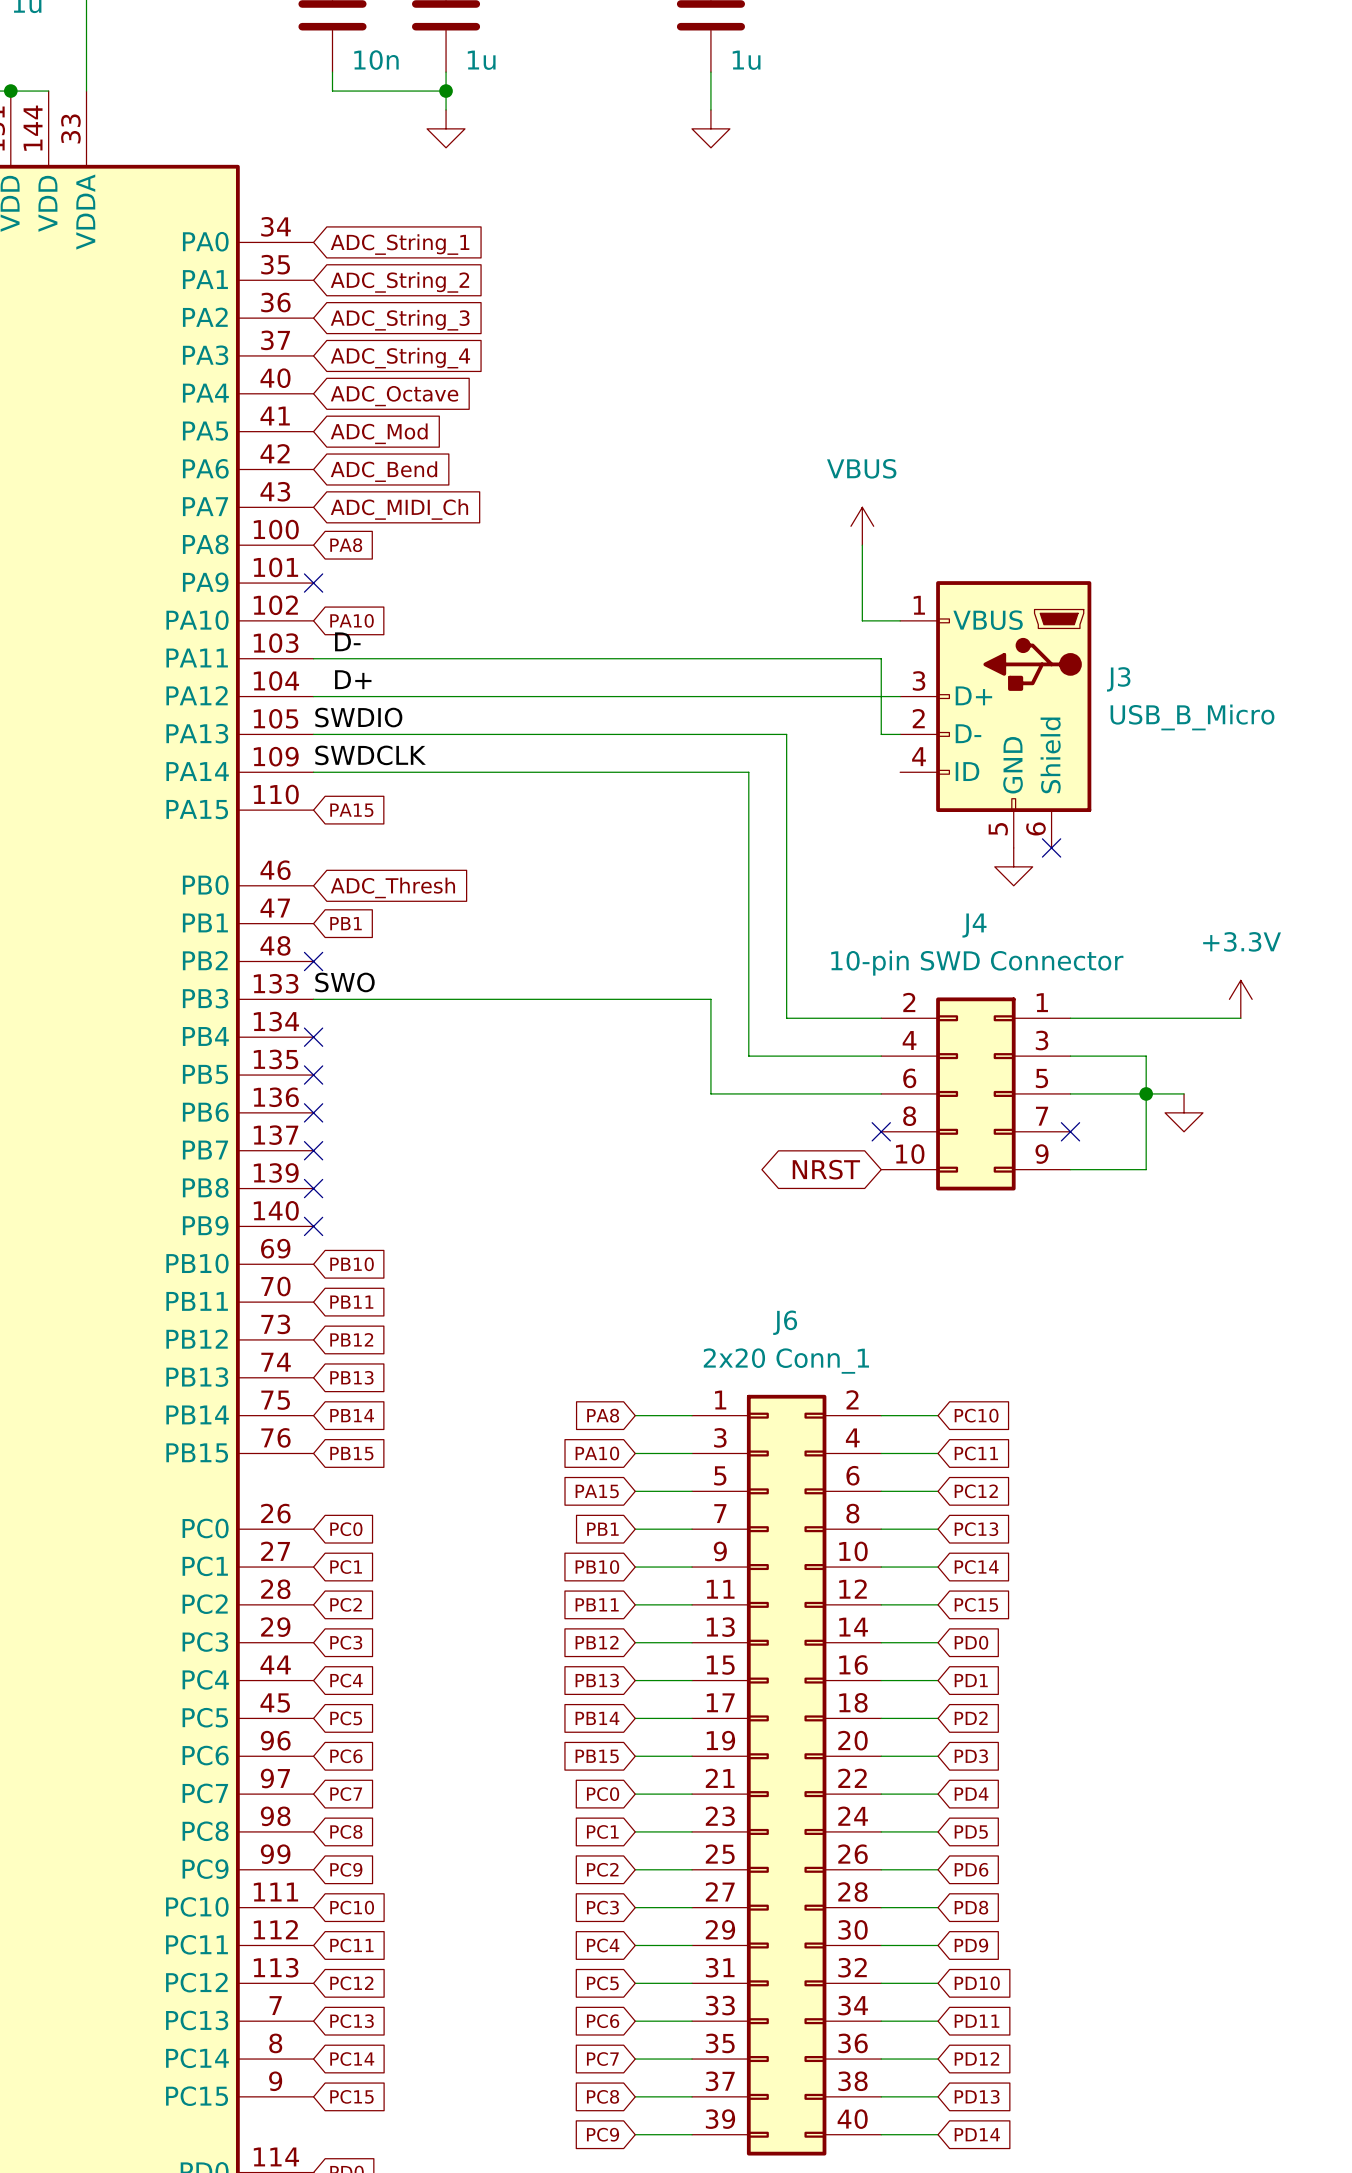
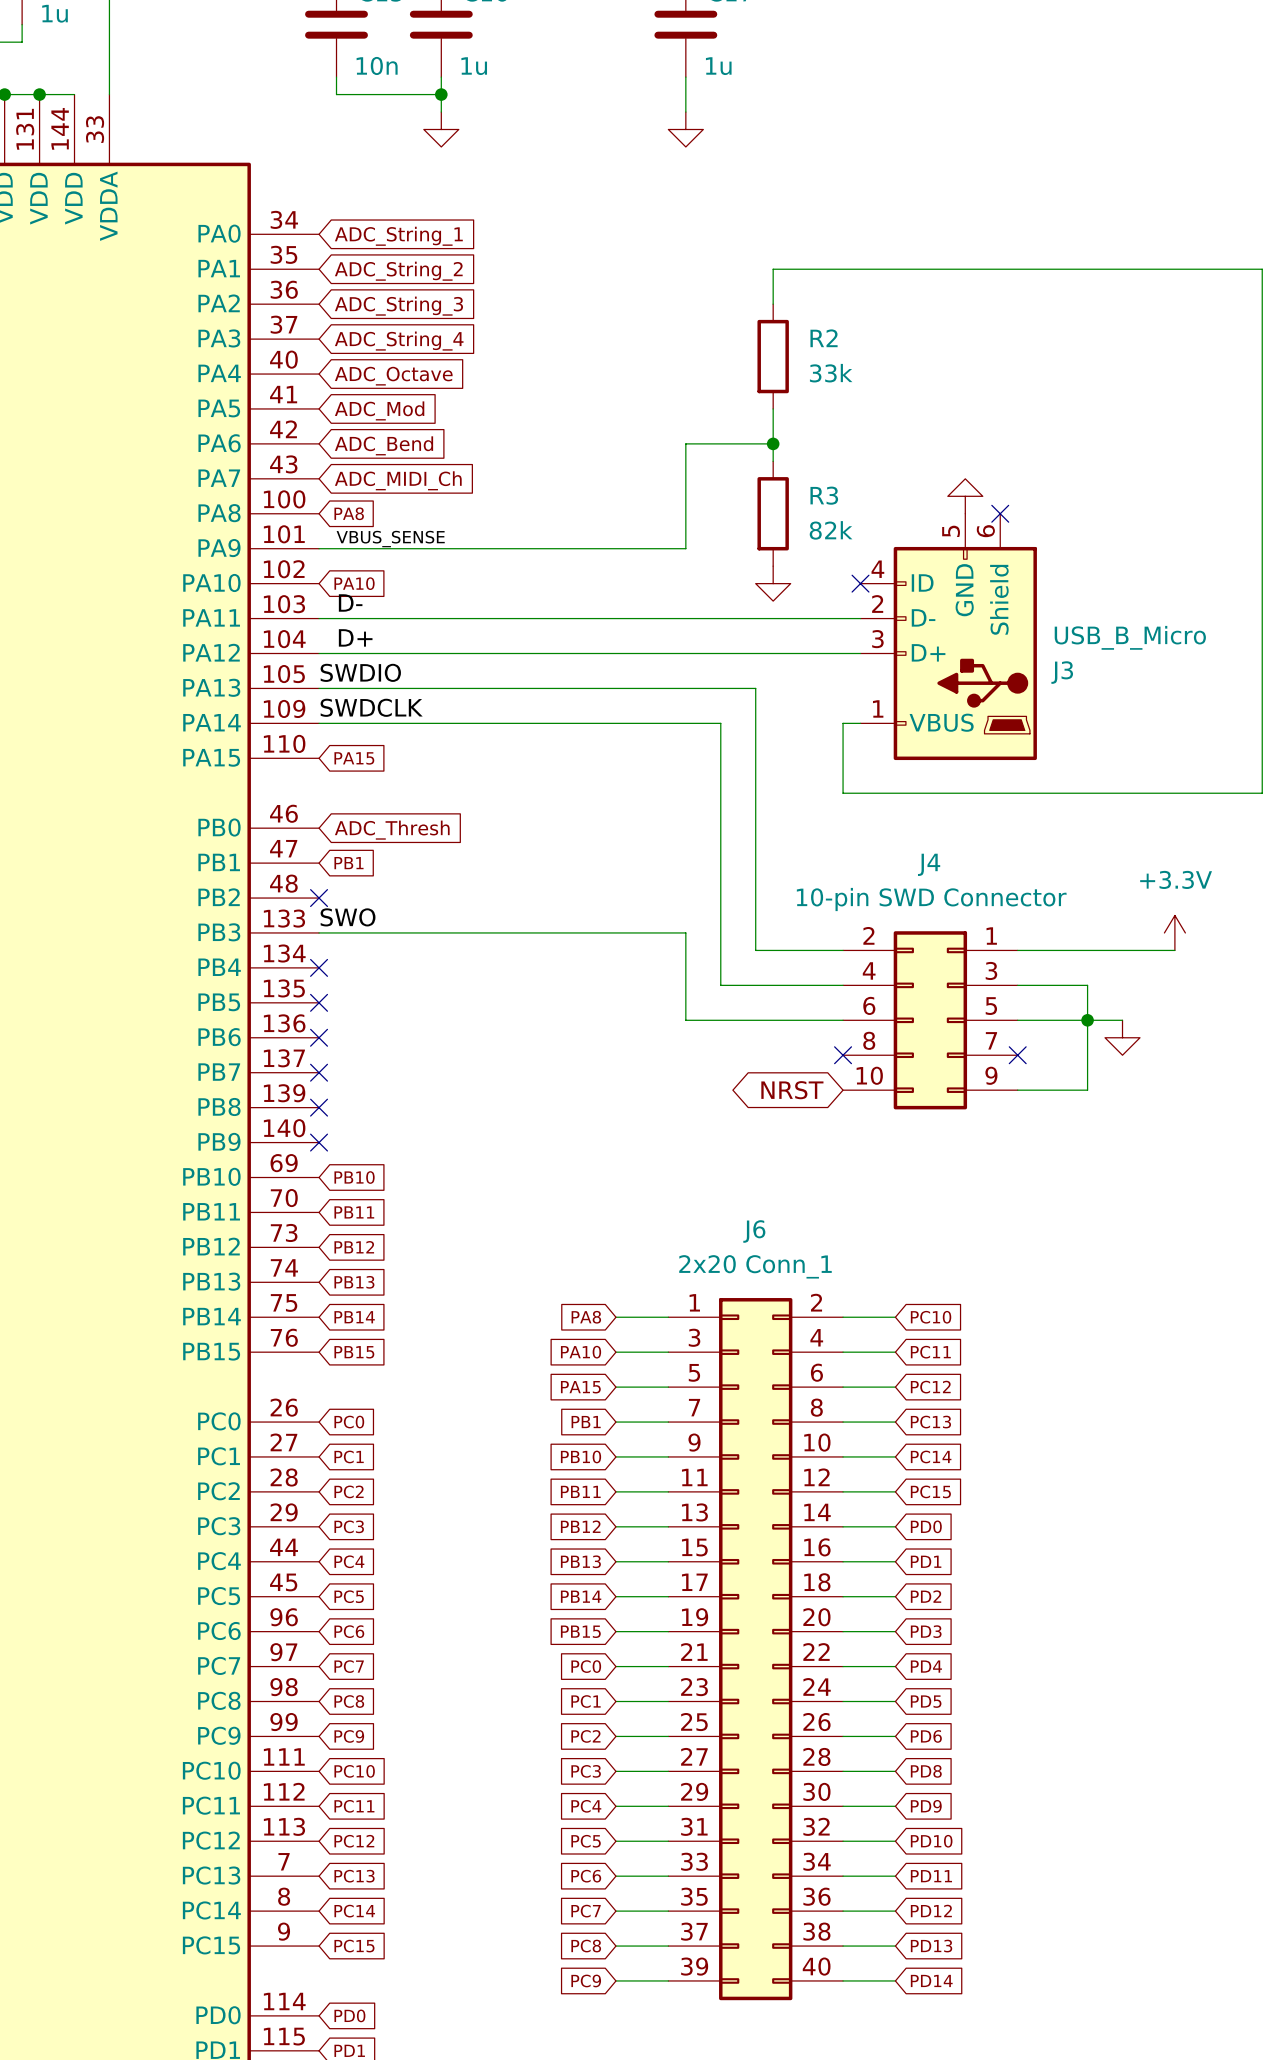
wire: none -> (773, 304) (773, 269) (1262, 269) (1262, 793) (843, 793) (843, 723) (860, 723)
R2: none -> 33k (773, 356)
wire: none -> (773, 408) (773, 461)
wire: none -> (773, 443) (685, 443) (685, 548) (319, 548)
junction: none -> (773, 443)
power symbol: VBUS (862, 526) -> none
power symbol: none -> (965, 496)
R3: none -> 82k (773, 513)
wire: (862, 545) (862, 620) (900, 620) -> none
no-connect mark: none -> (1000, 513)
label: none -> VBUS_SENSE (390, 539)
no-connect mark: (313, 583) -> none
power symbol: none -> (773, 583)
no-connect mark: none -> (860, 583)
wire: (881, 658) (881, 734) (900, 734) -> (843, 618) (860, 618)
J3 flip: as is (1013, 696) -> up-down (965, 653)
no-connect mark: (1051, 847) -> none
power symbol: (1013, 866) -> none

